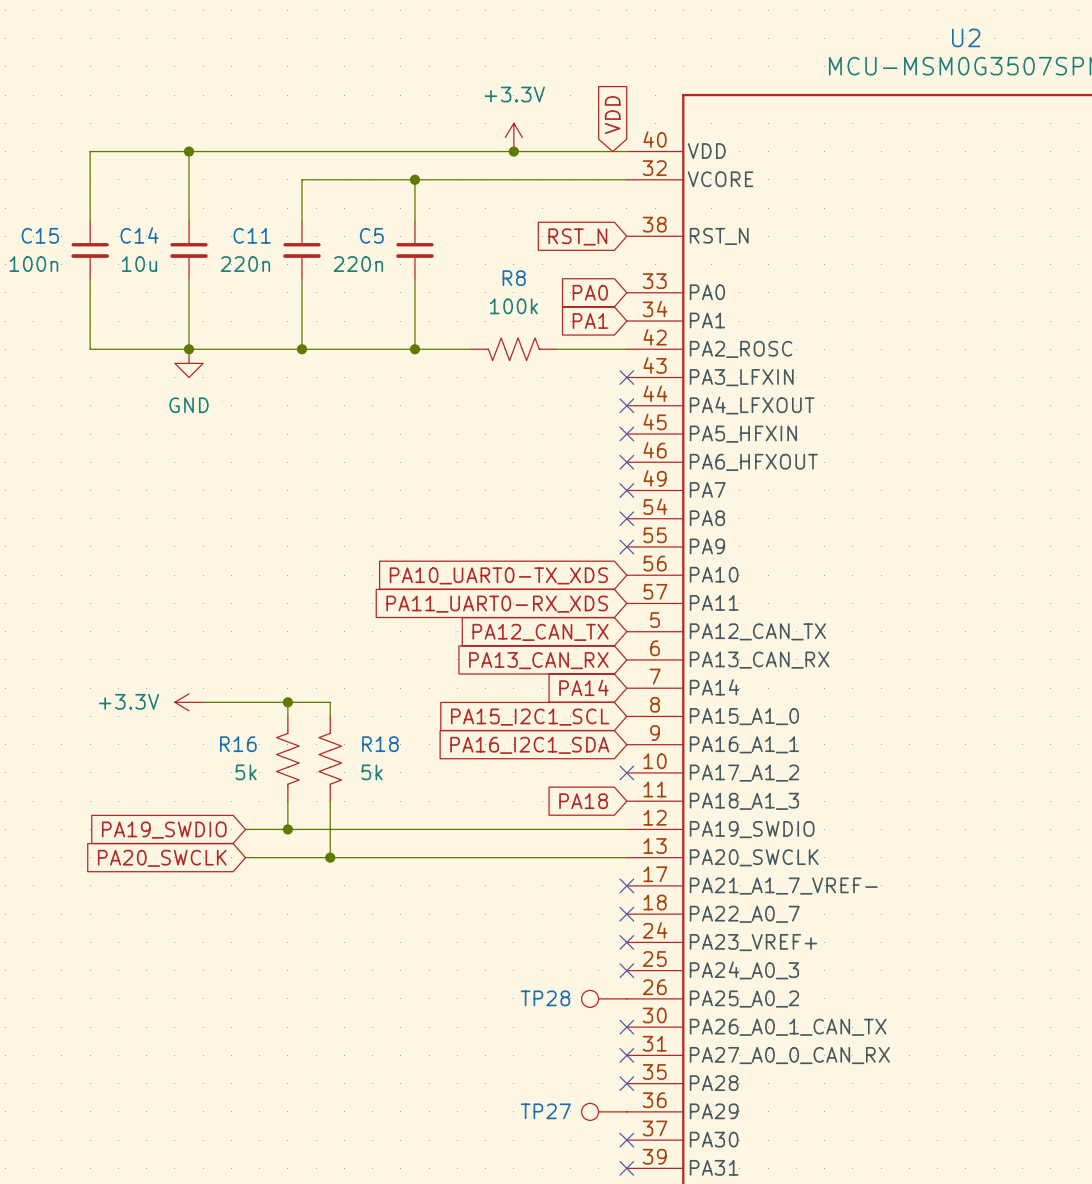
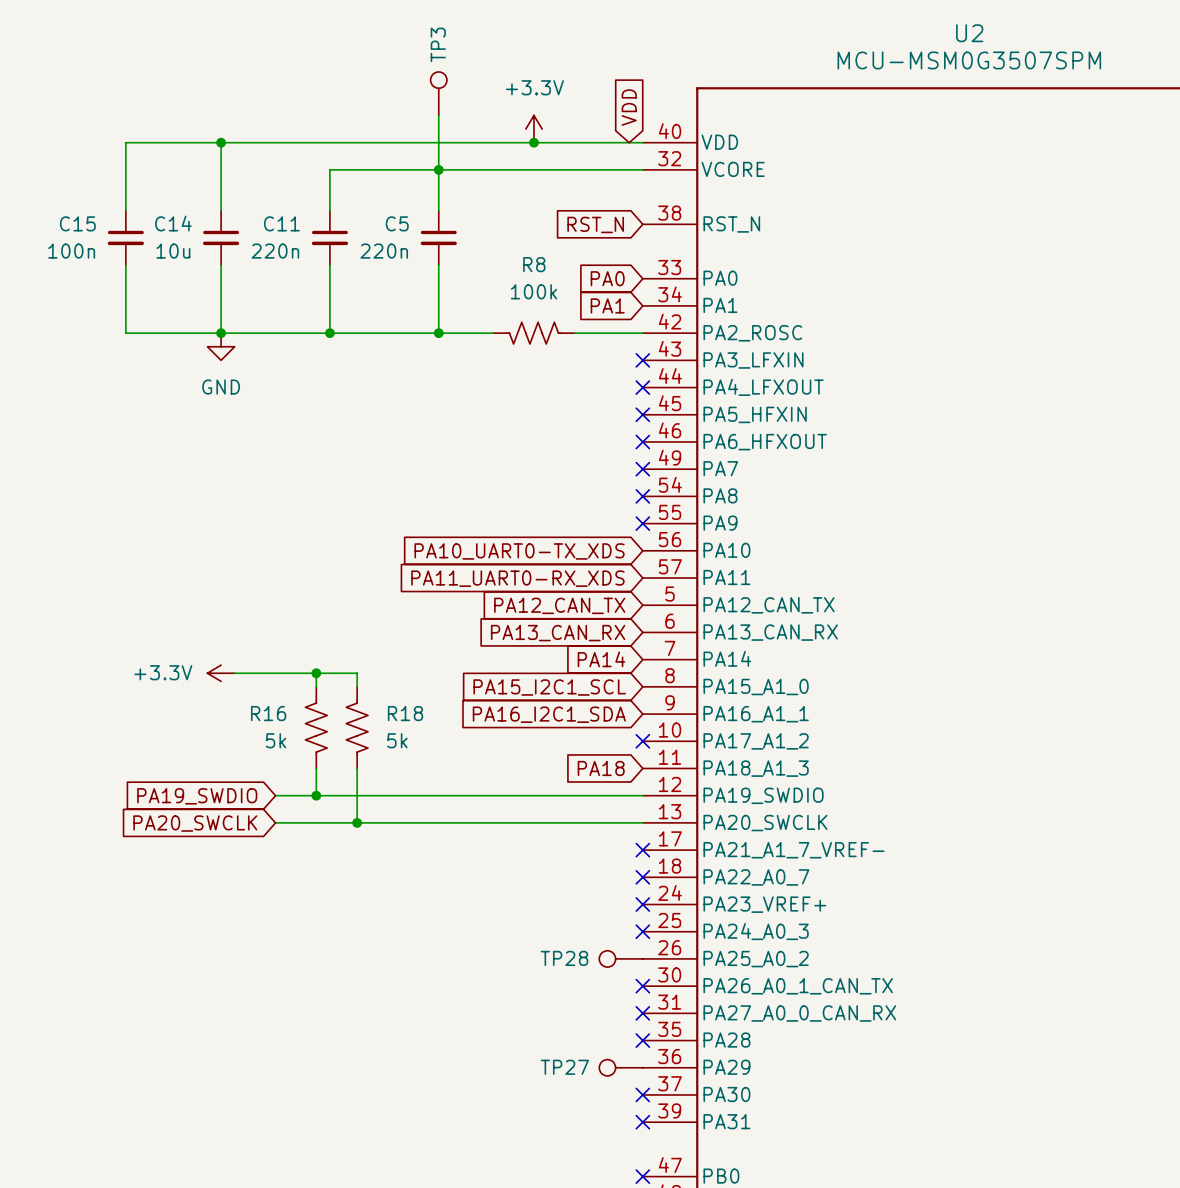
TP3: none -> (438, 93)
wire: none -> (438, 115) (438, 169)

